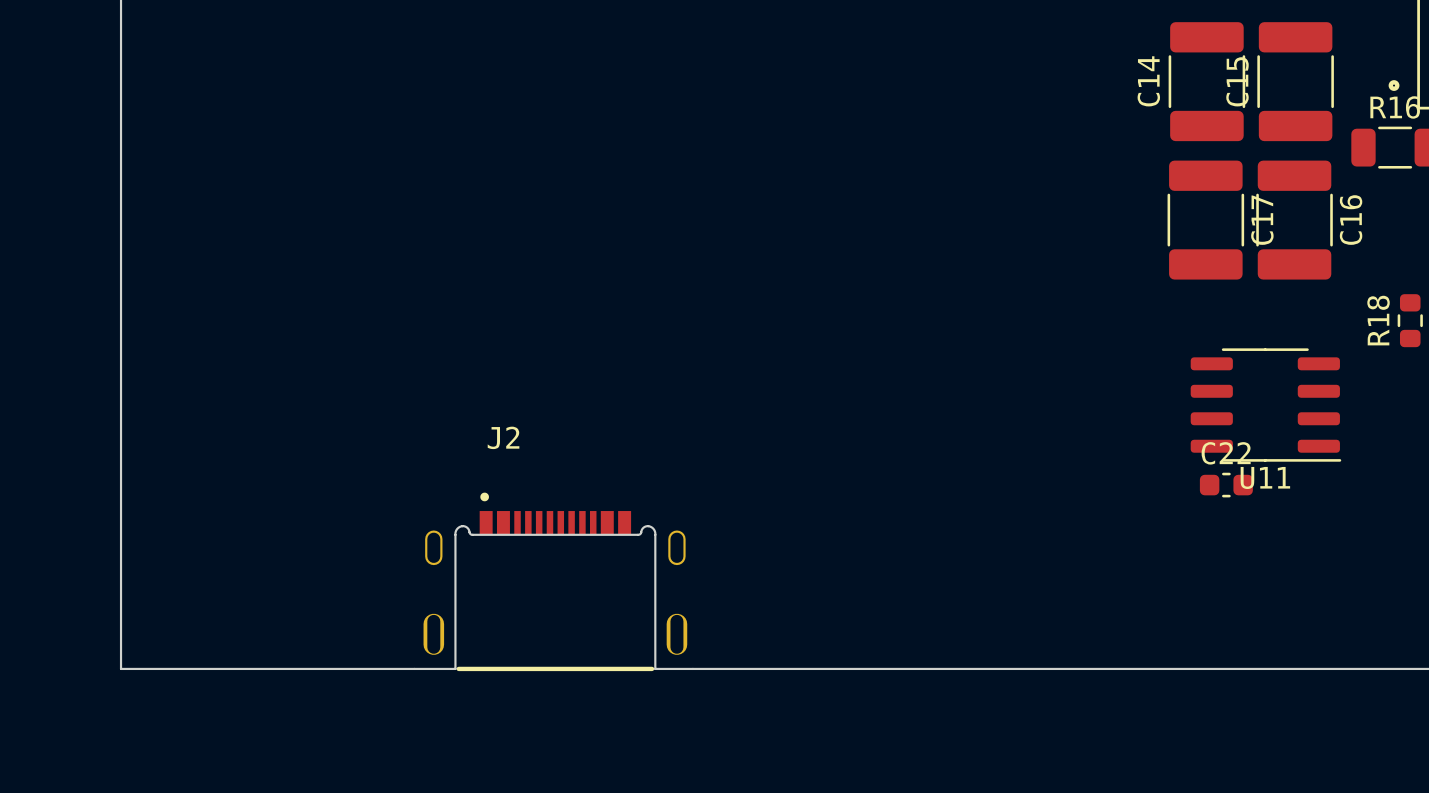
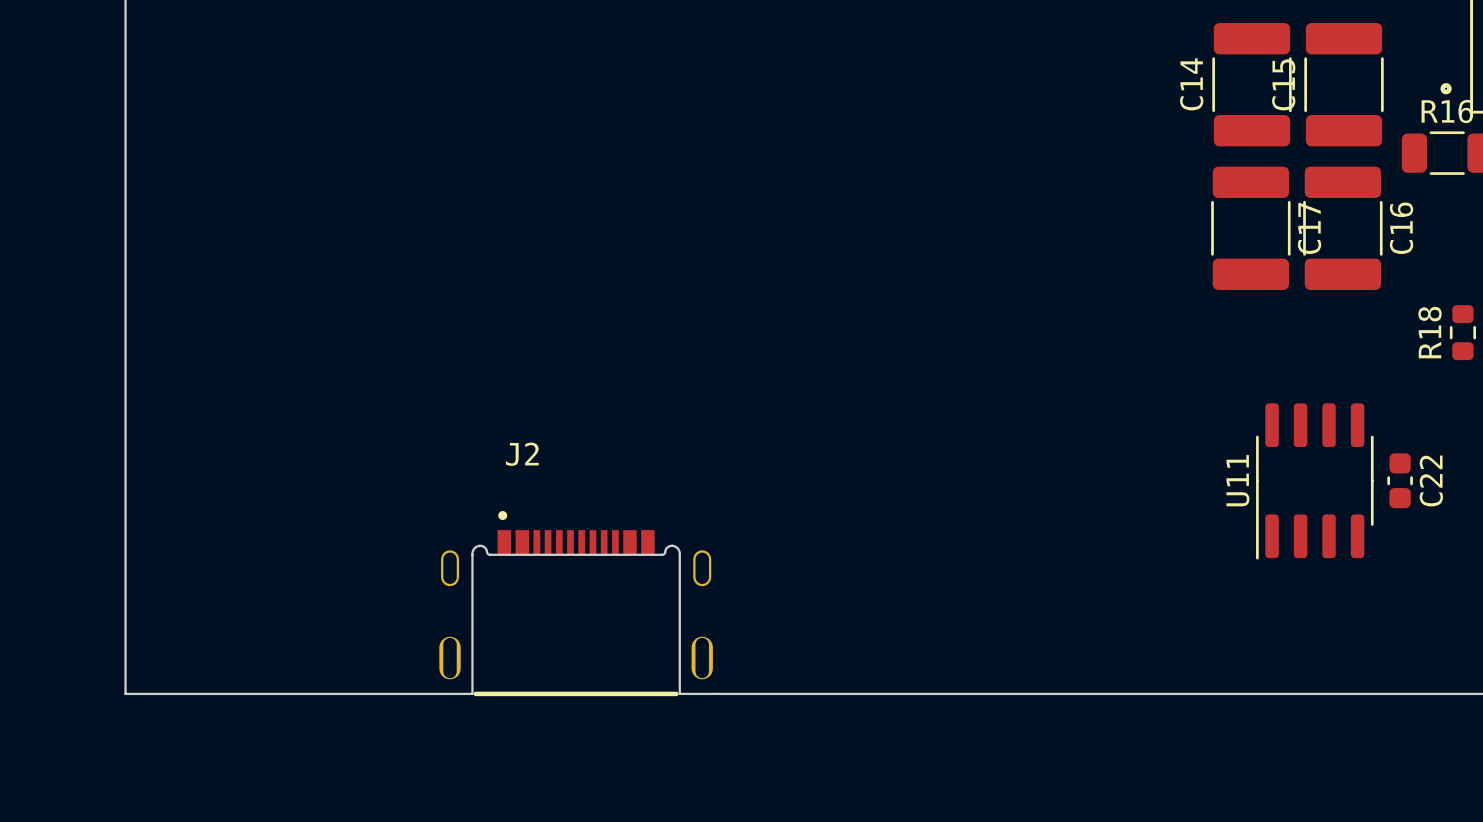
U11 rotation: 0° (1265, 405) -> 90° clockwise (1314, 481)
C22 rotation: 0° (1226, 485) -> 90° clockwise (1400, 480)
C22 position: (1226, 485) -> (1400, 480)

